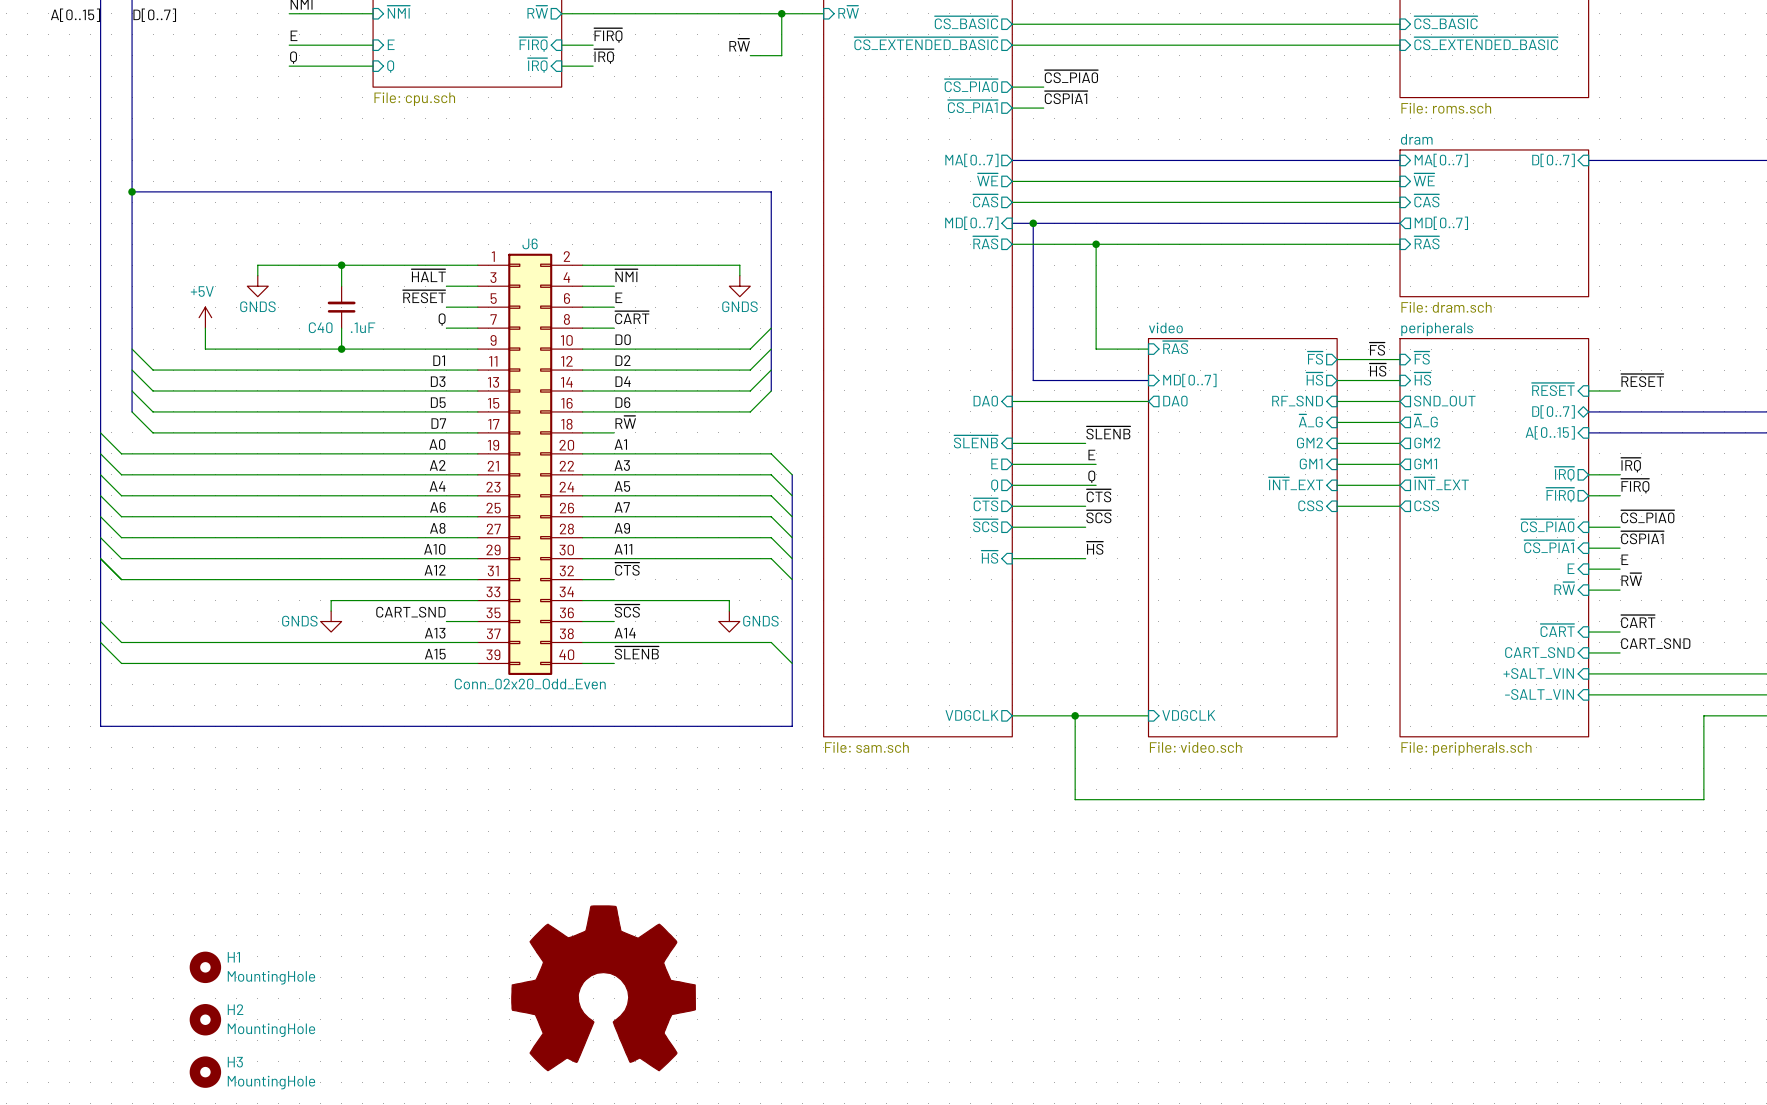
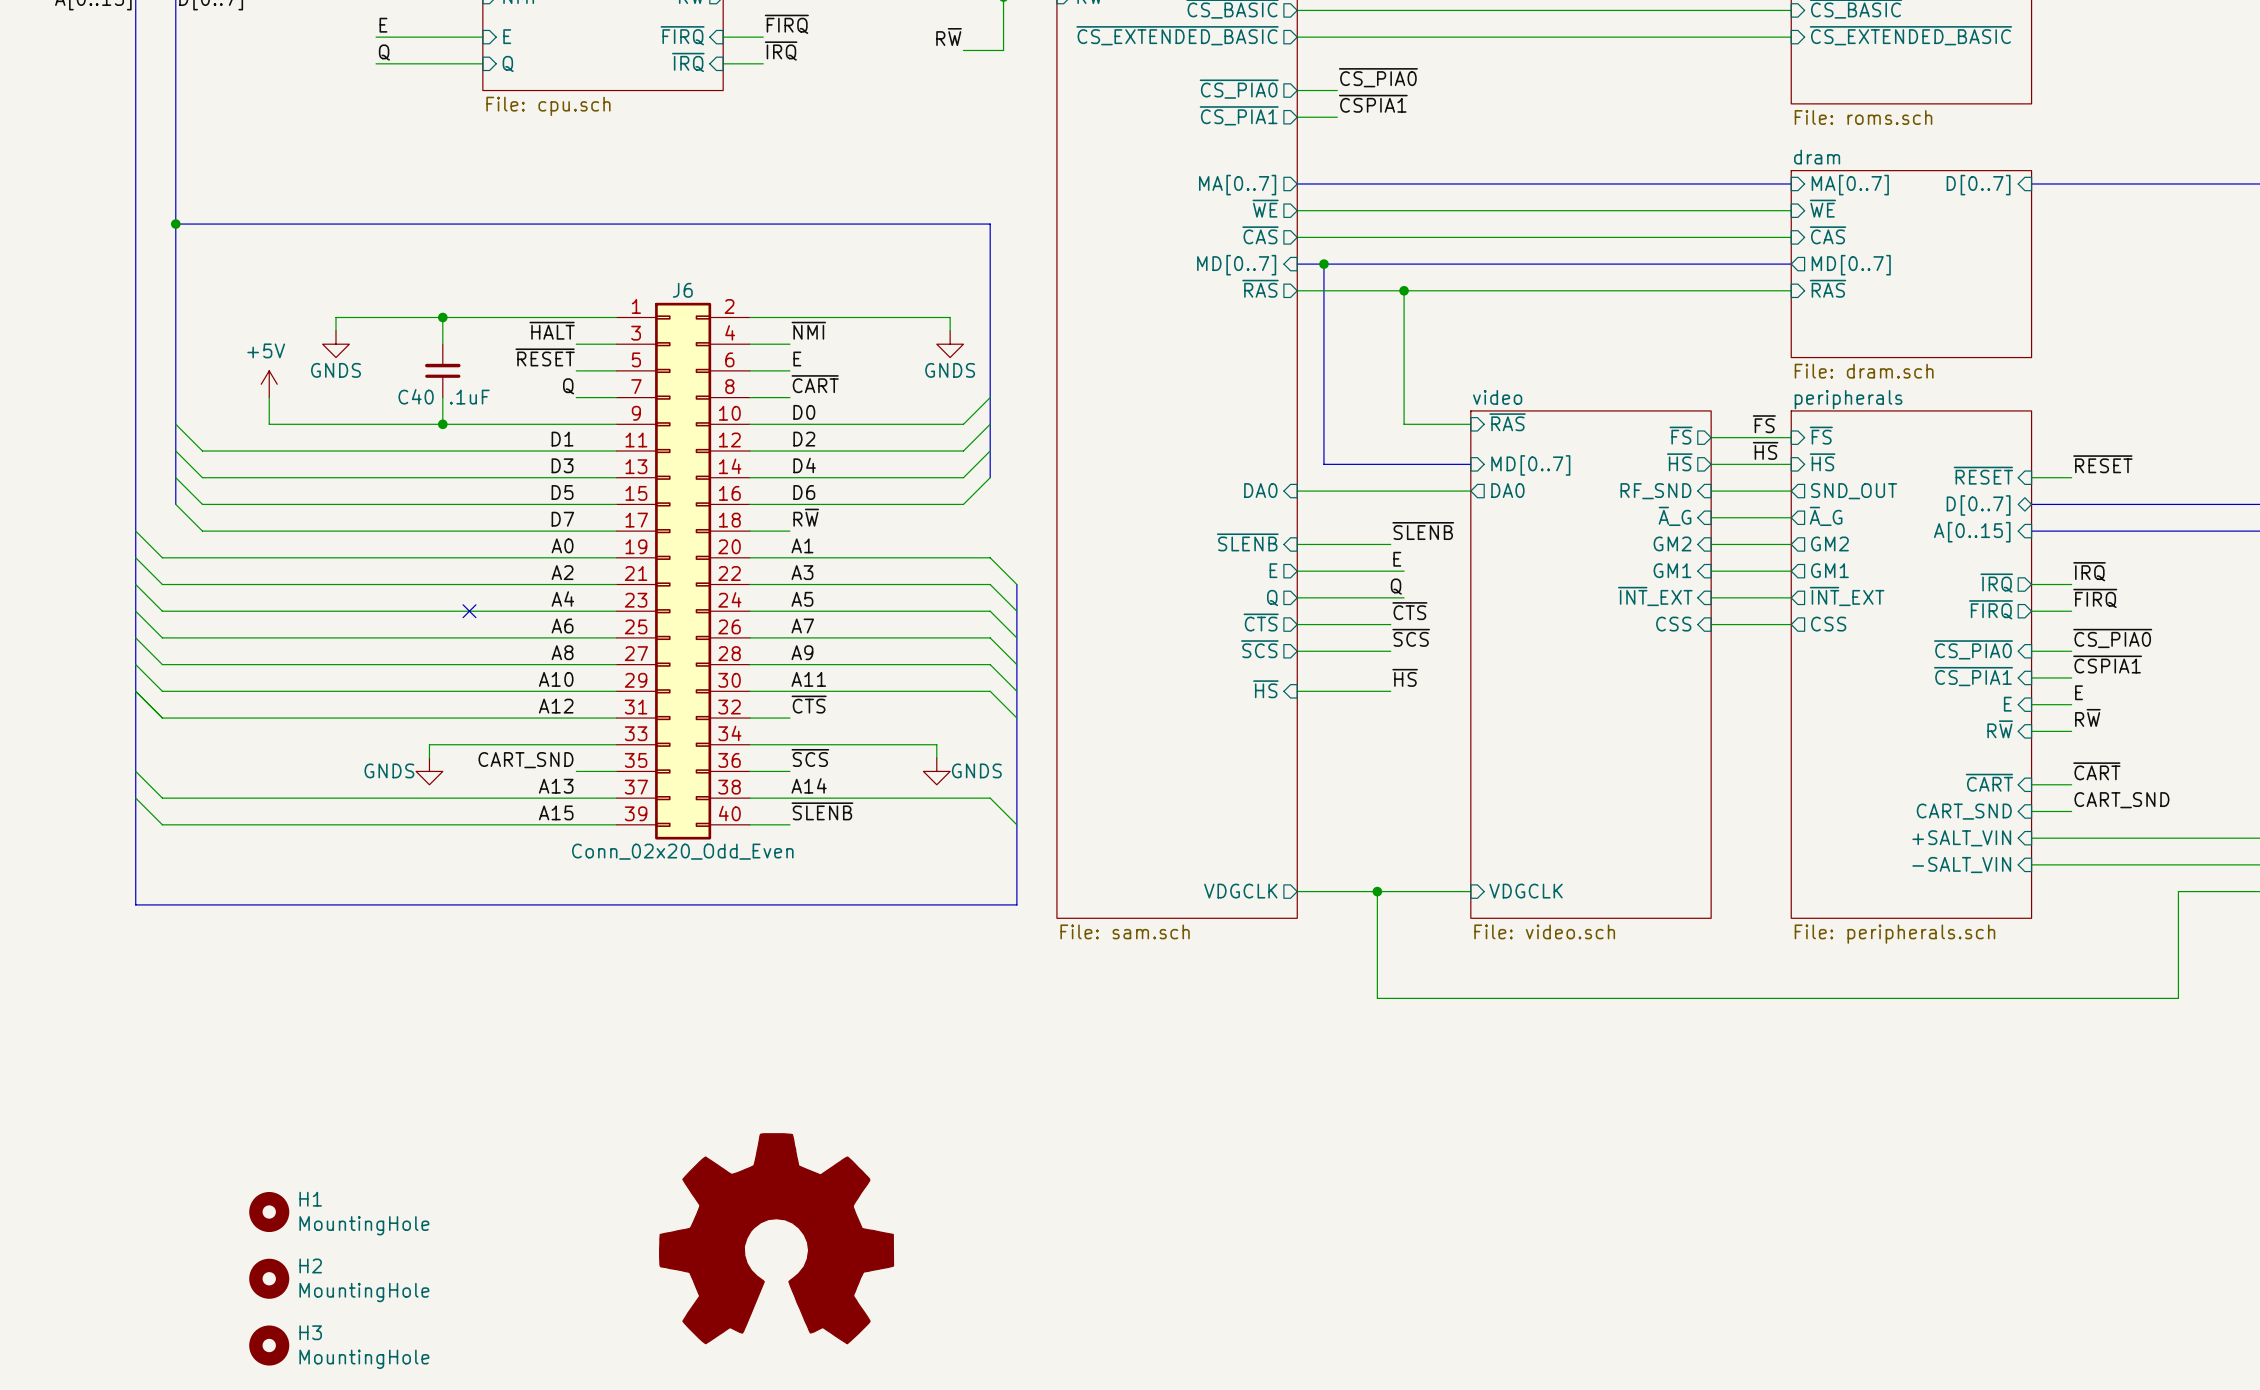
no-connect mark: none -> (469, 611)

